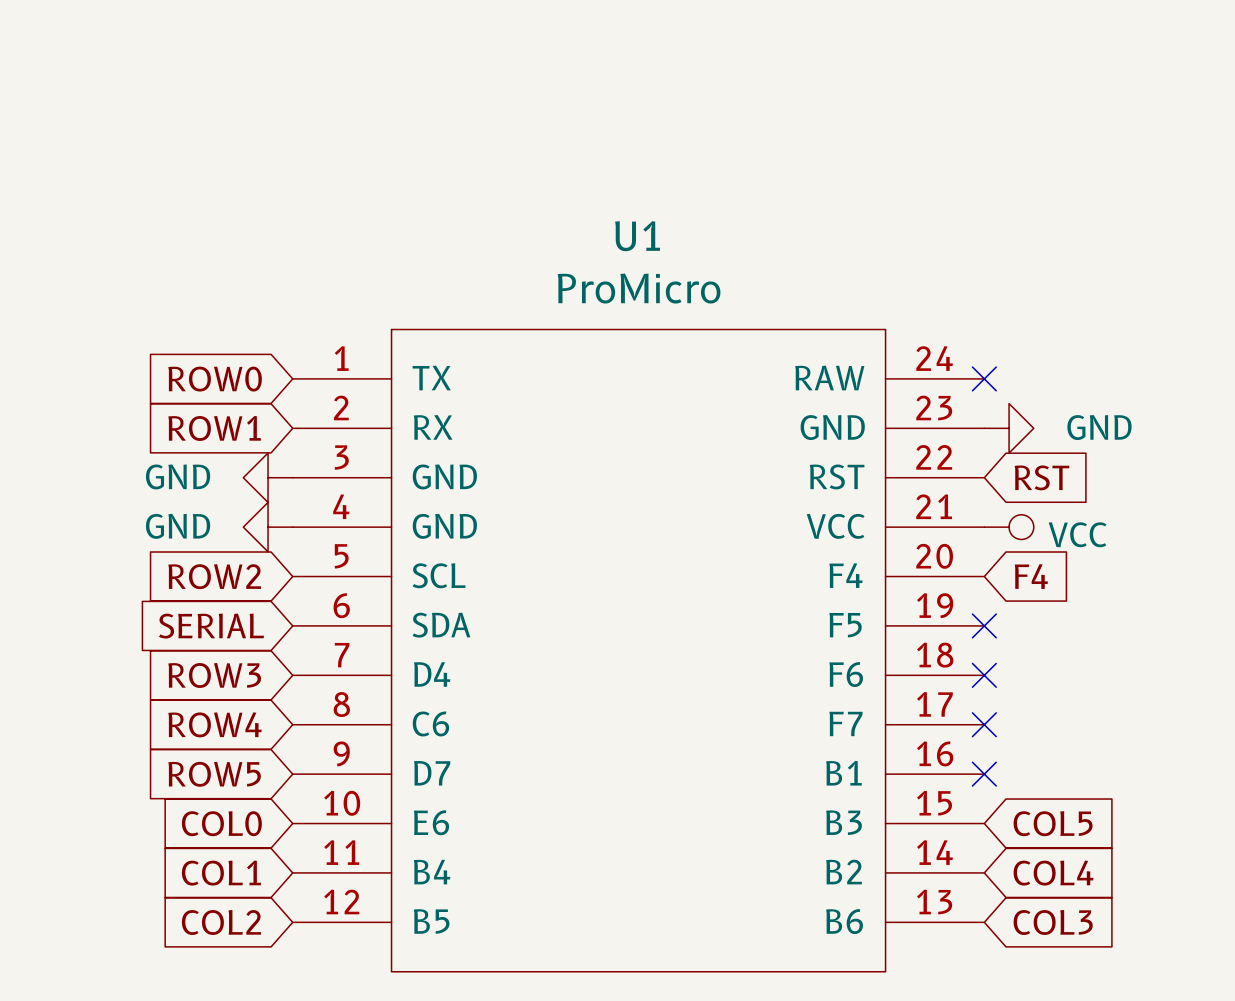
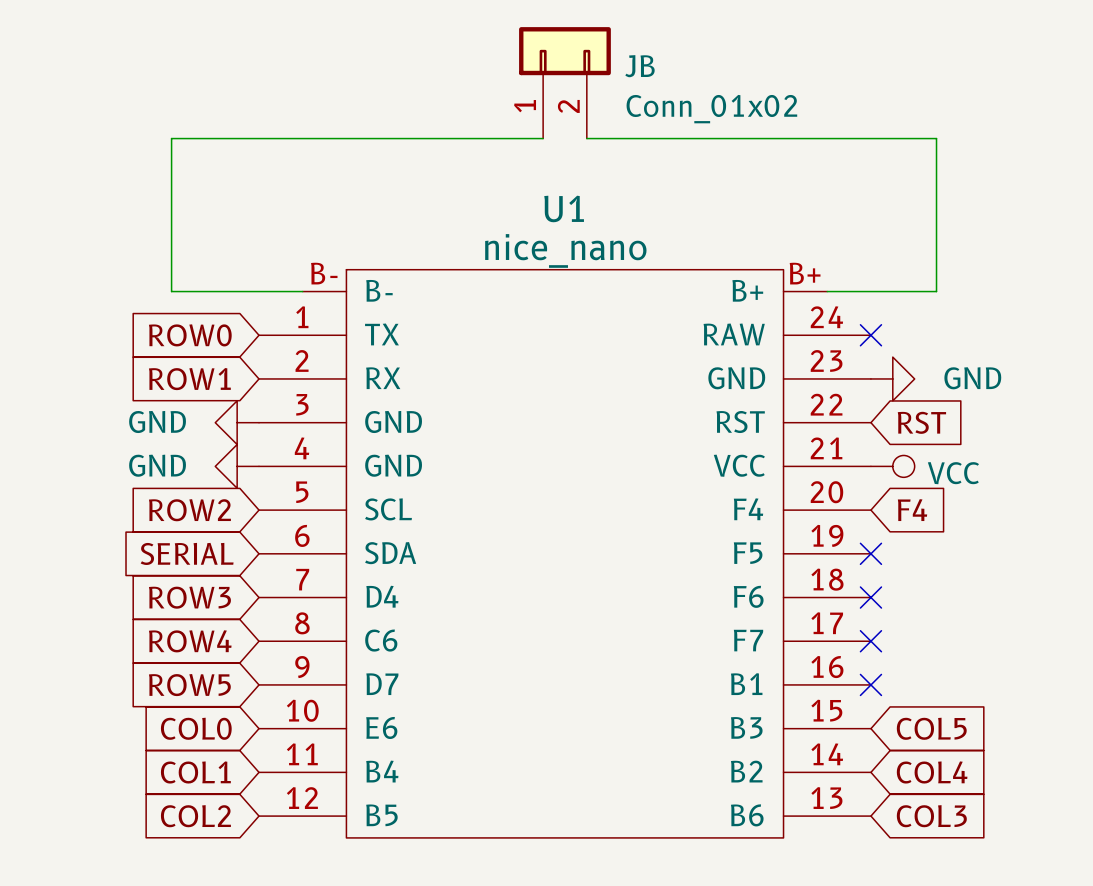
JB: none -> Conn_01x02 (564, 82)
wire: none -> (543, 138) (171, 138) (171, 291) (302, 291)
wire: none -> (586, 138) (936, 138) (936, 291) (827, 291)
U1 value: ProMicro (639, 288) -> nice_nano (565, 250)
U1 symbol: [292, 329, 985, 972] -> [259, 269, 871, 838]

